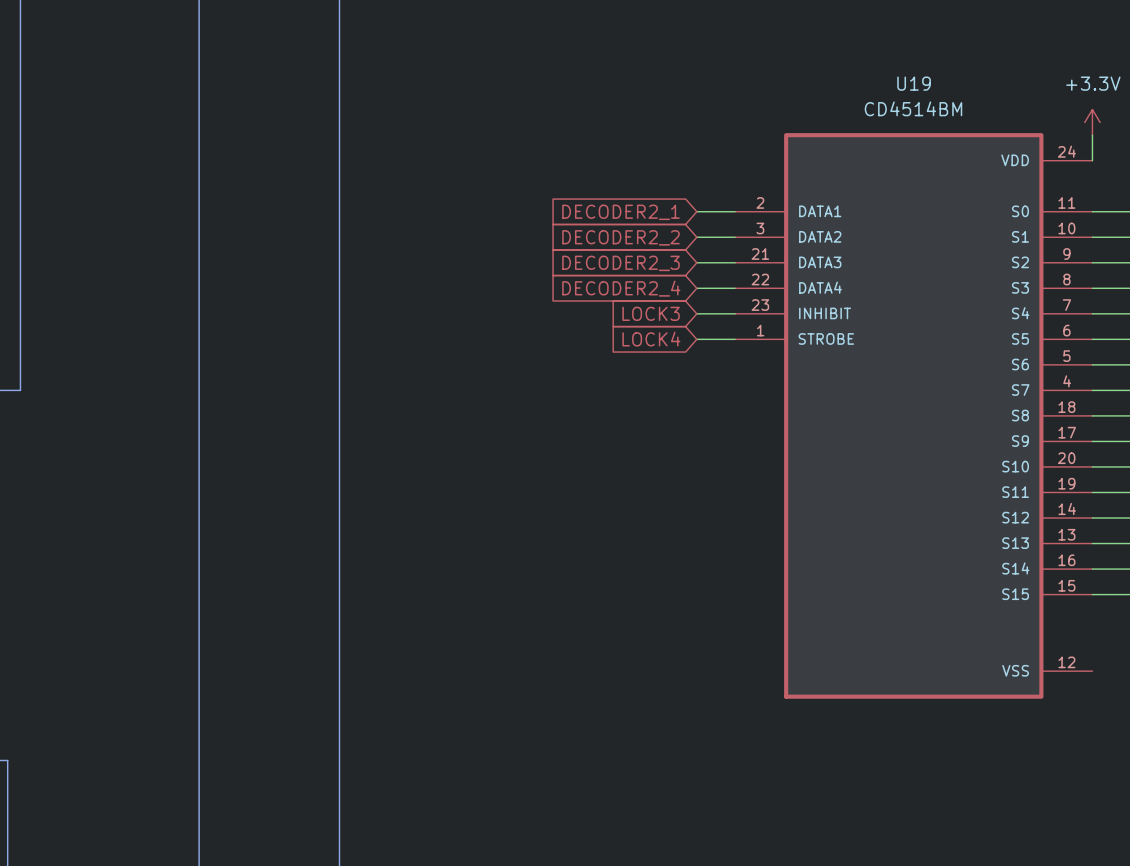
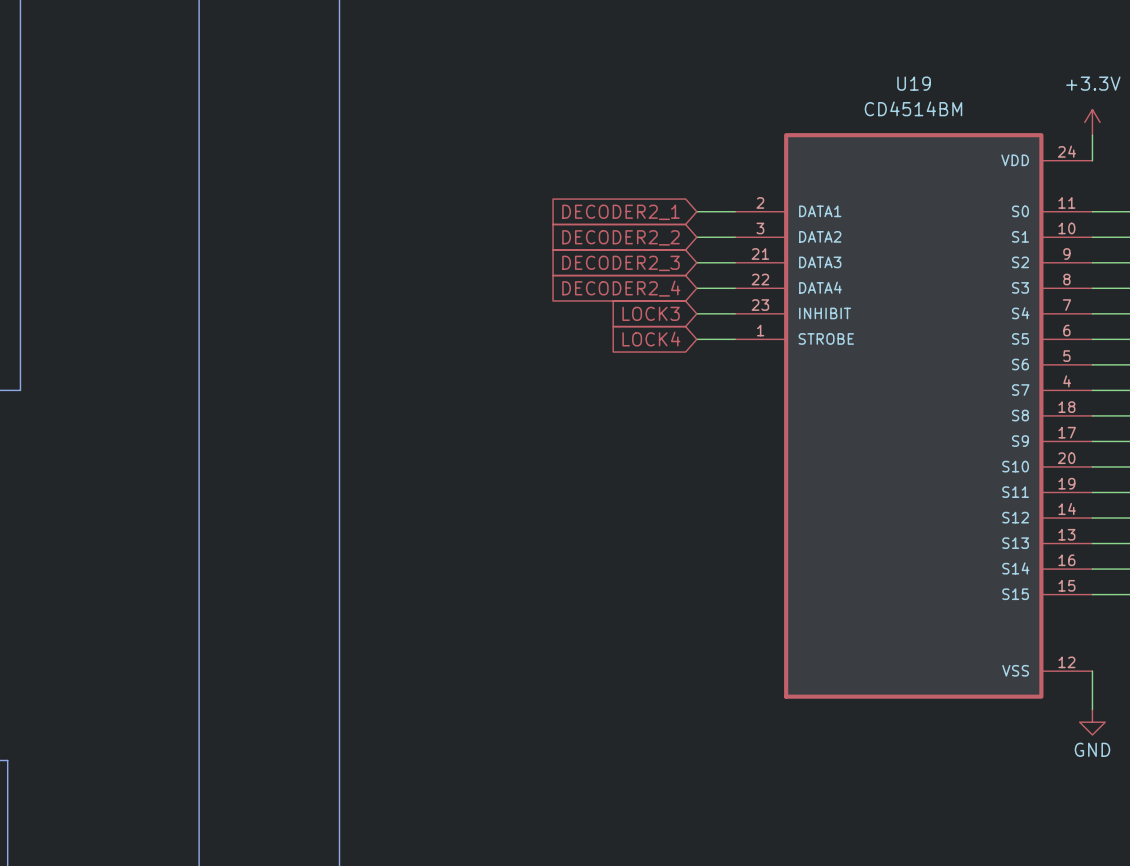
wire: none -> (1092, 671) (1092, 709)
power symbol: none -> GND (1092, 722)

